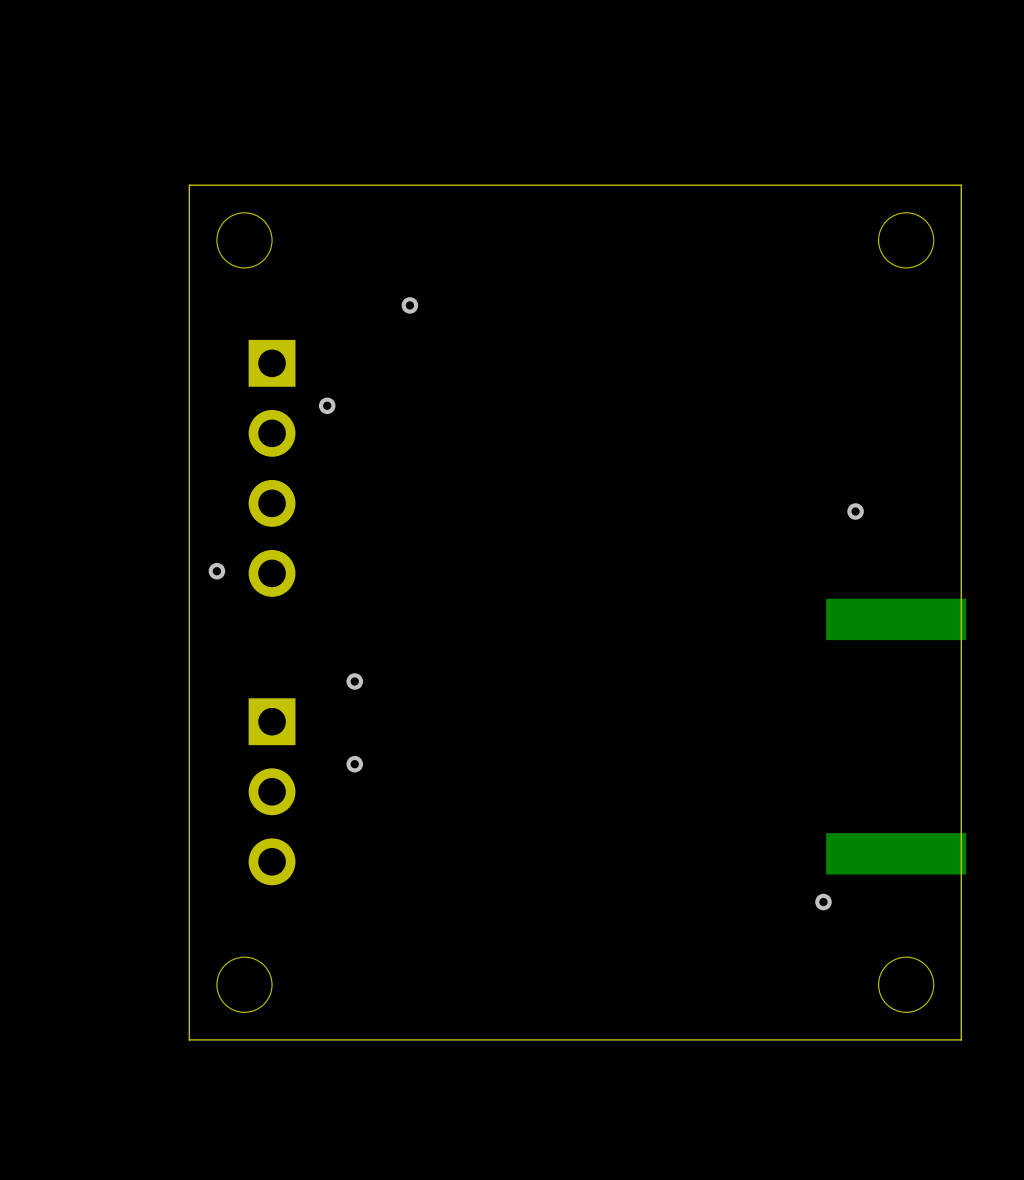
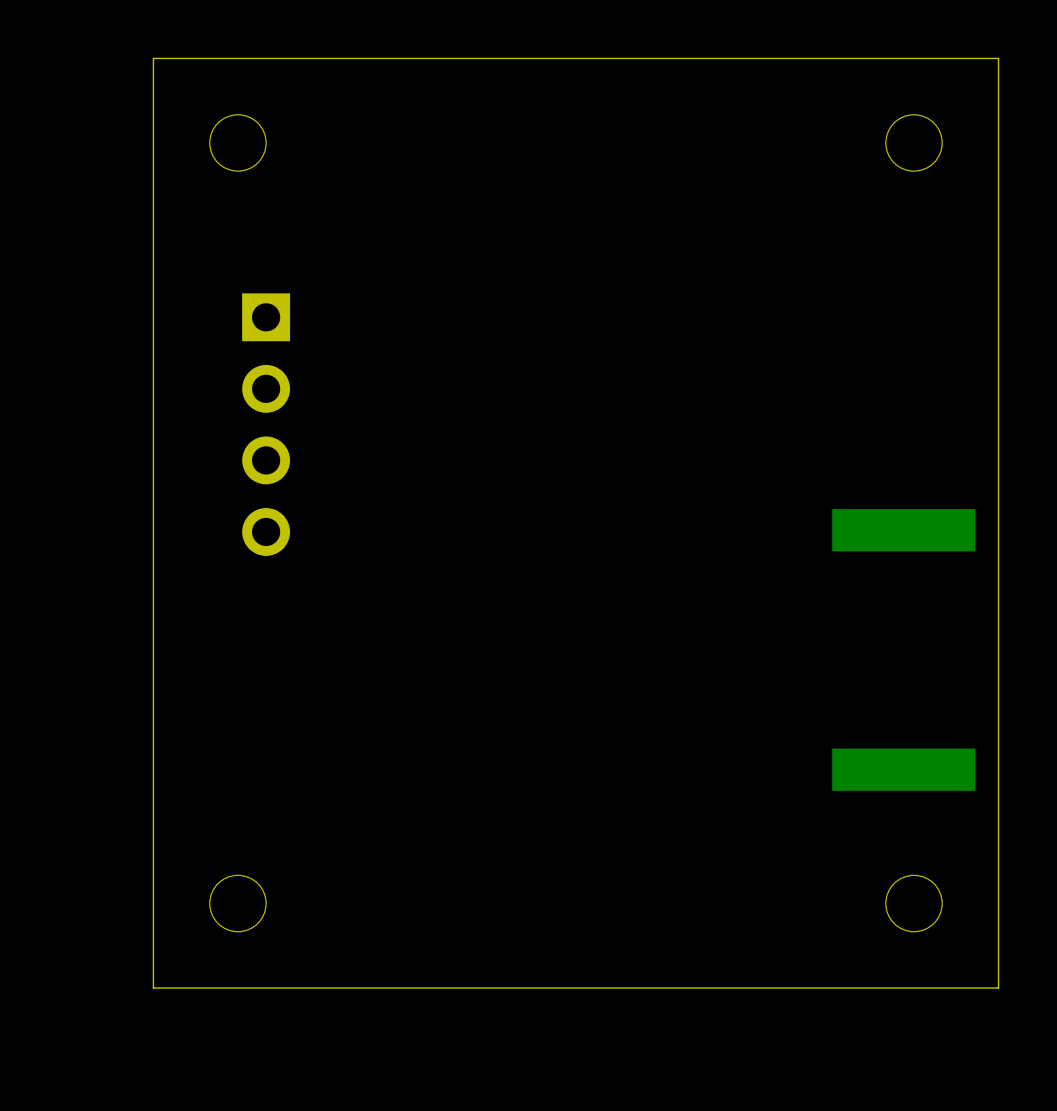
board edge: (961, 185) (189, 185) (189, 1039) (961, 1039) (961, 185) -> (998, 58) (998, 988) (153, 988) (153, 58) (998, 58)
via: (409, 305) -> none
via: (327, 405) -> none
part position: (272, 468) -> (266, 424)
via: (855, 511) -> none
via: (216, 571) -> none
via: (354, 681) -> none
via: (354, 764) -> none
part: (272, 791) -> none
via: (823, 902) -> none

